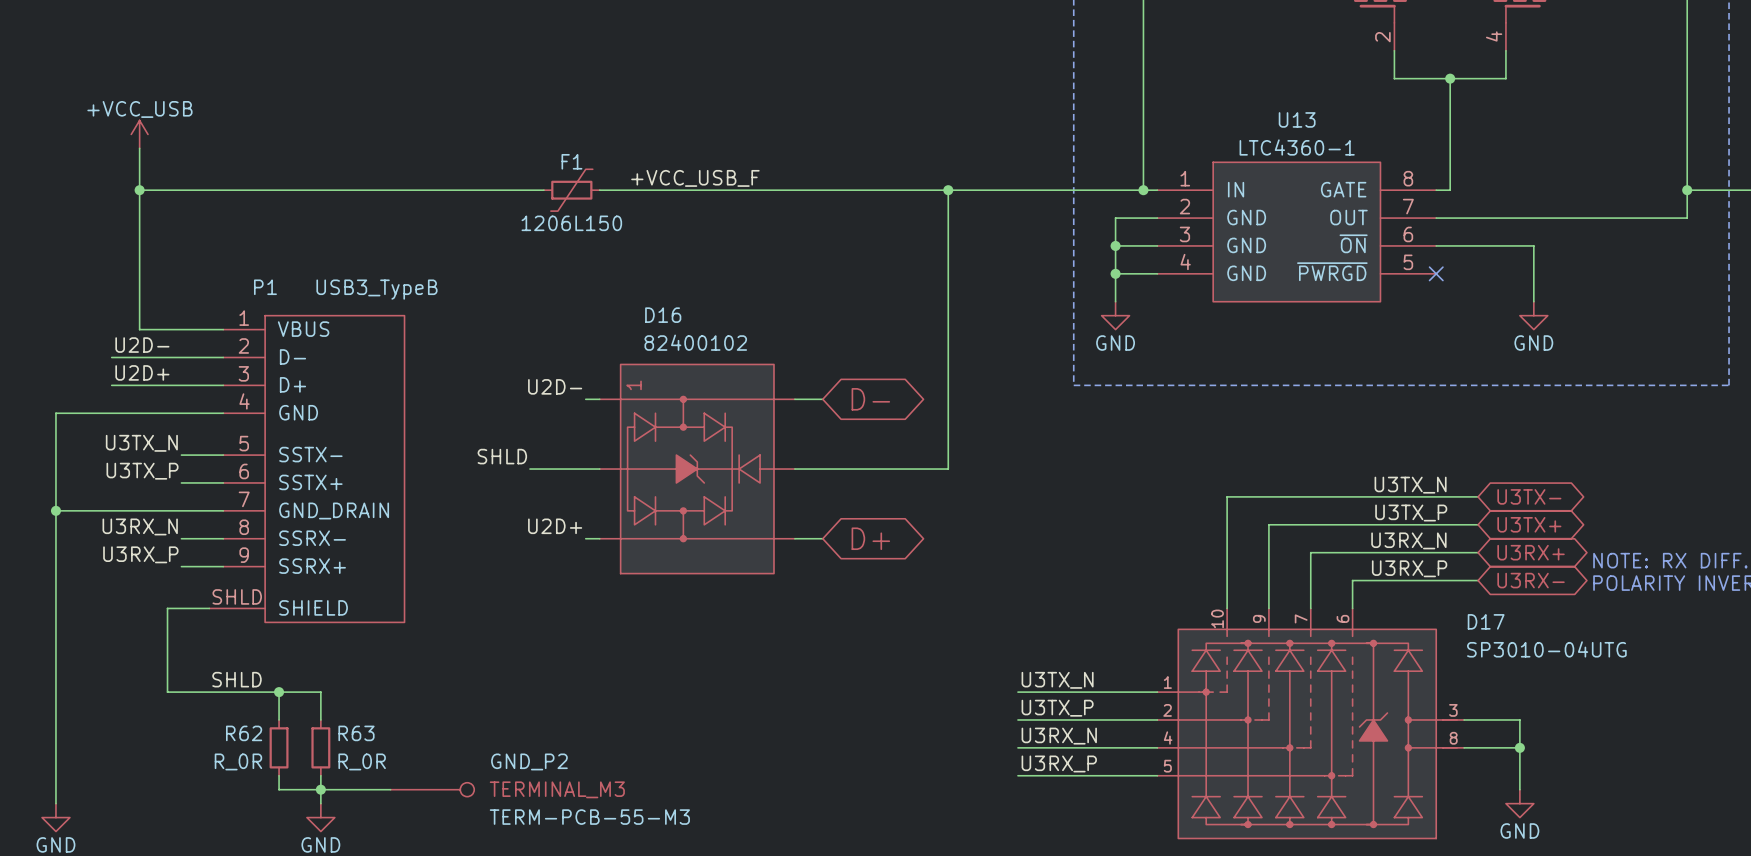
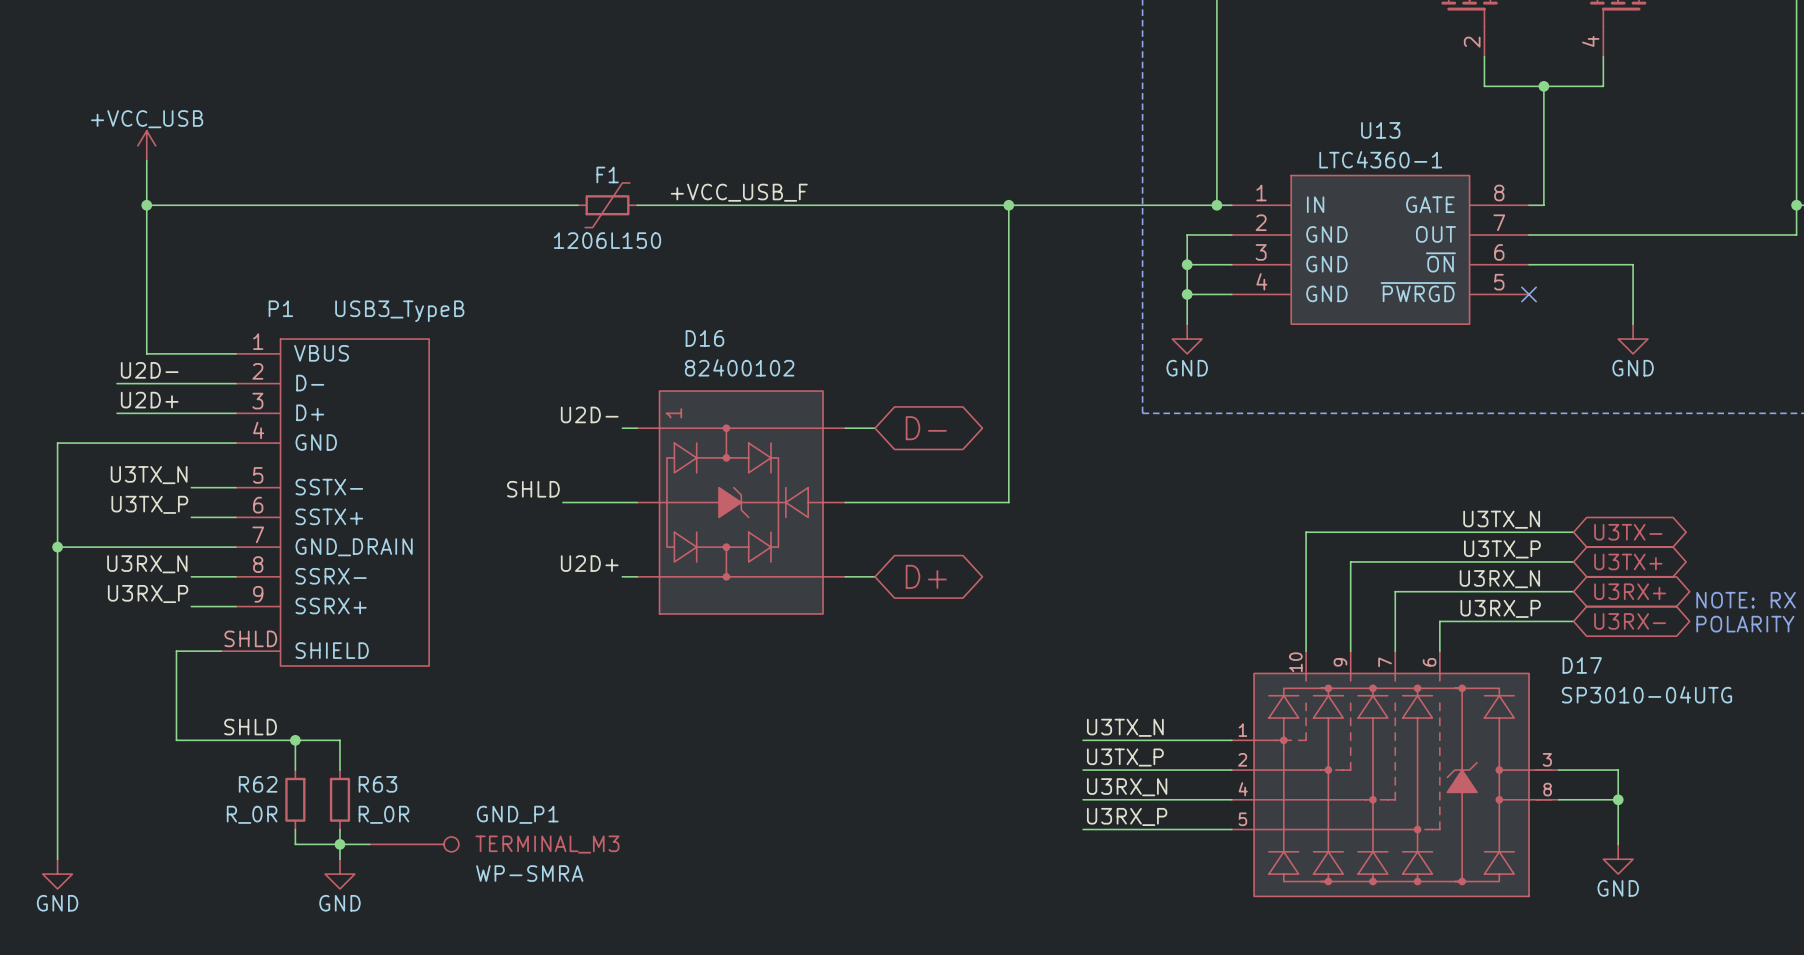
GND_P1: none -> WP-SMRA (414, 844)
GND_P2: TERM-PCB-55-M3 (432, 789) -> none

